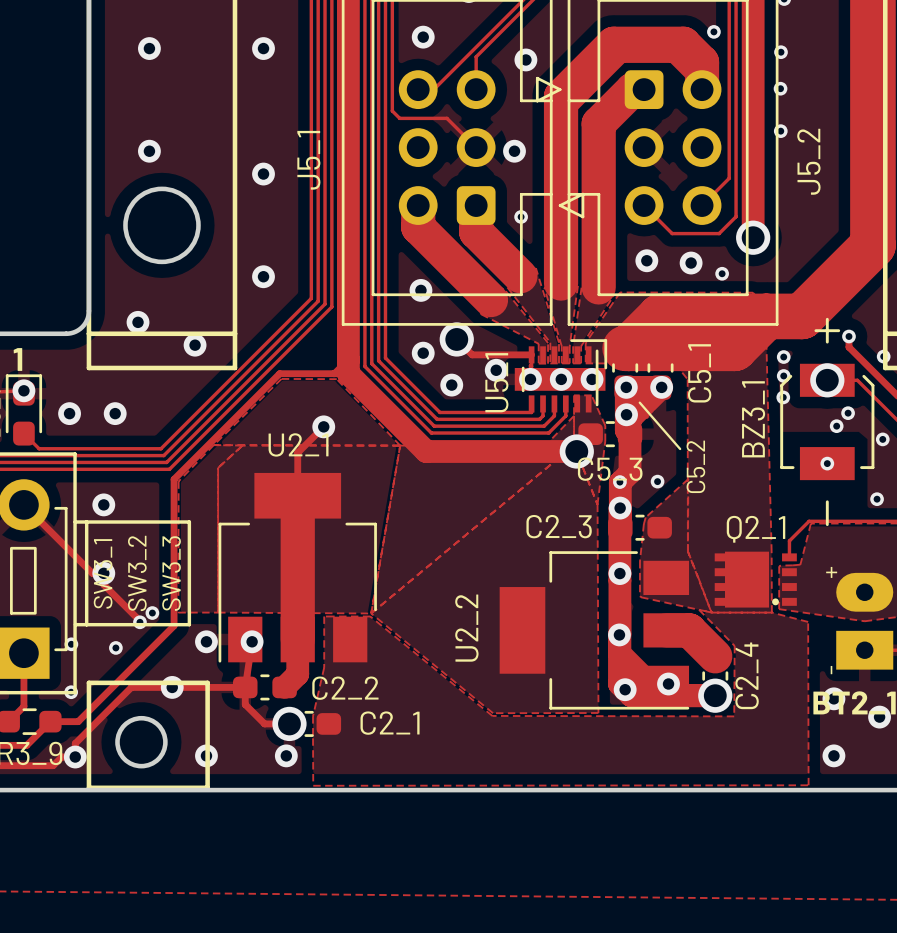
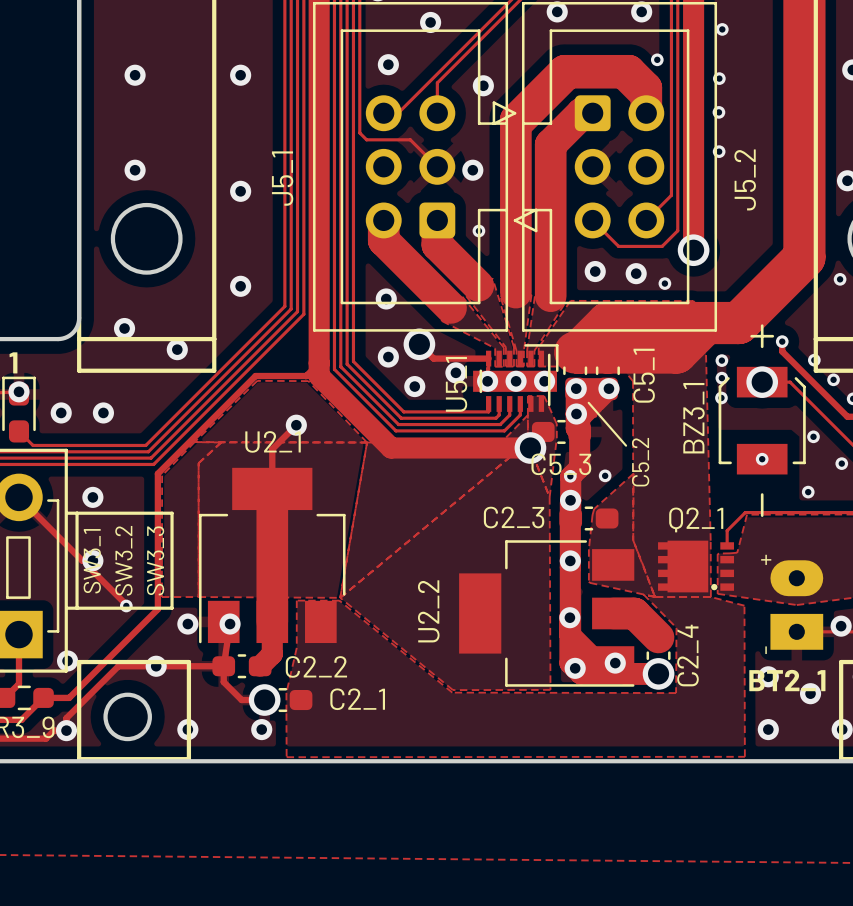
via: (848, 413) -> none
via: (836, 426) -> none
via: (152, 613) -> none
via: (71, 644) -> none
via: (115, 647) -> none
via size: [64, 685, 79, 700] -> [56, 650, 79, 672]

